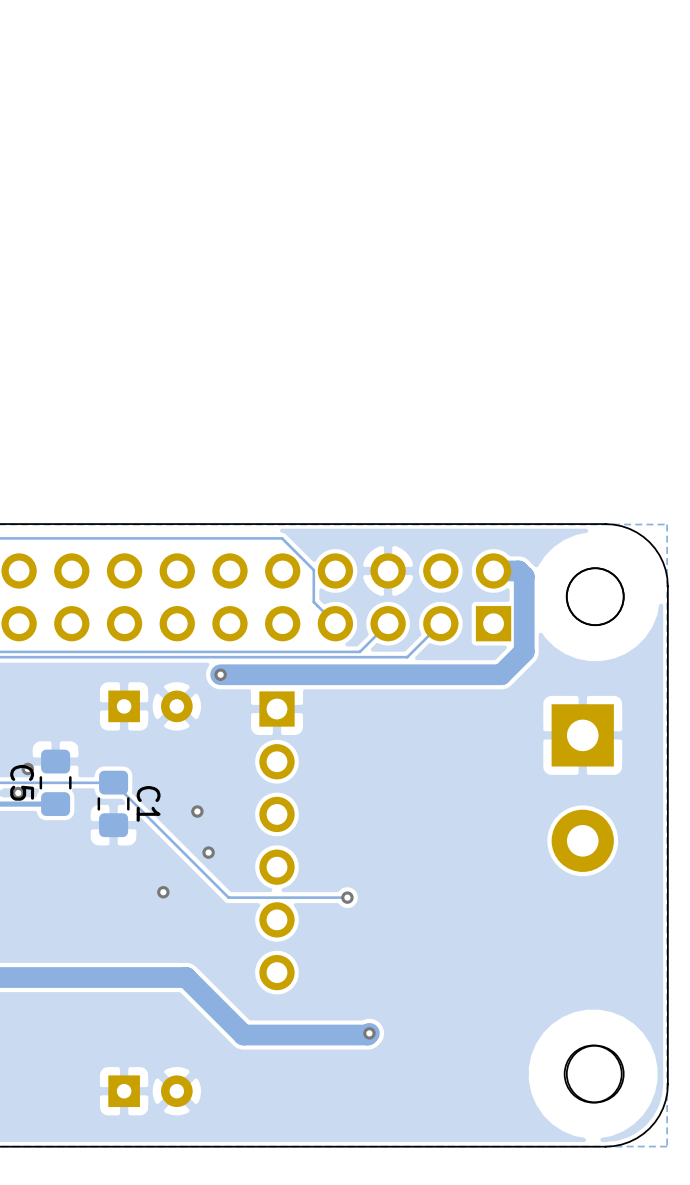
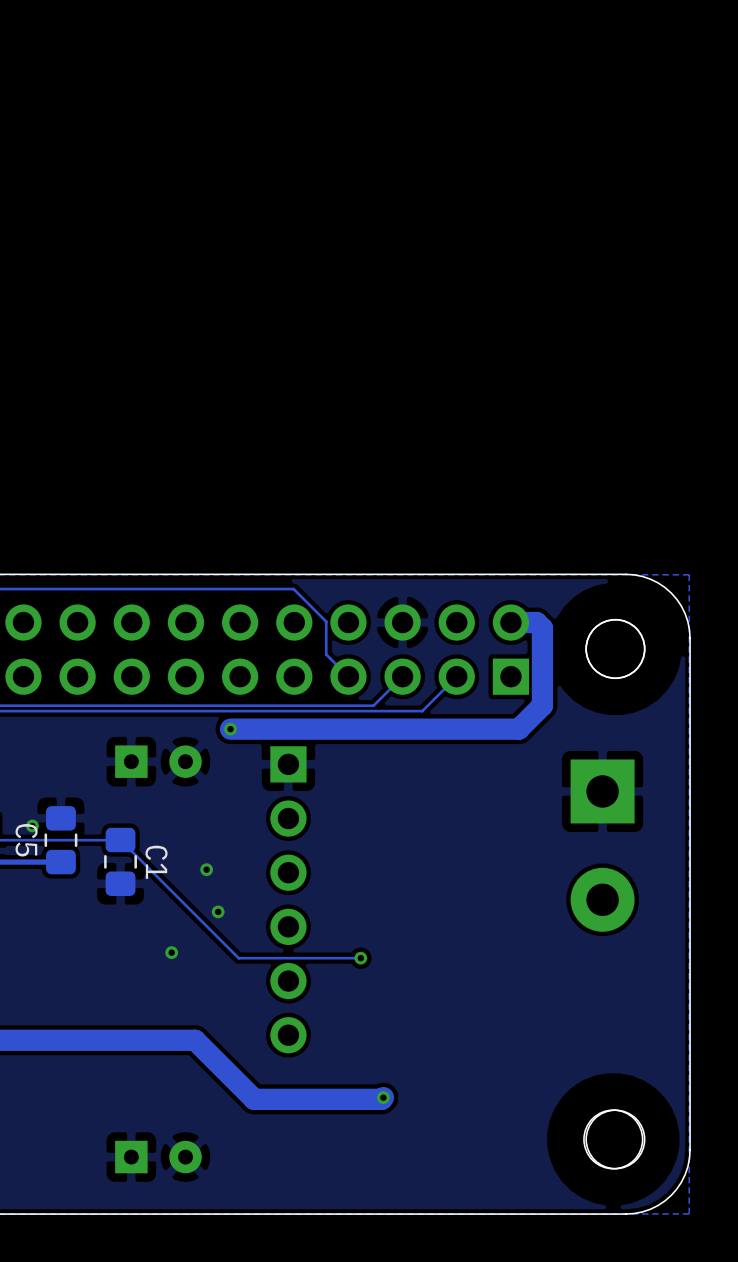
via: (18, 793) -> none

